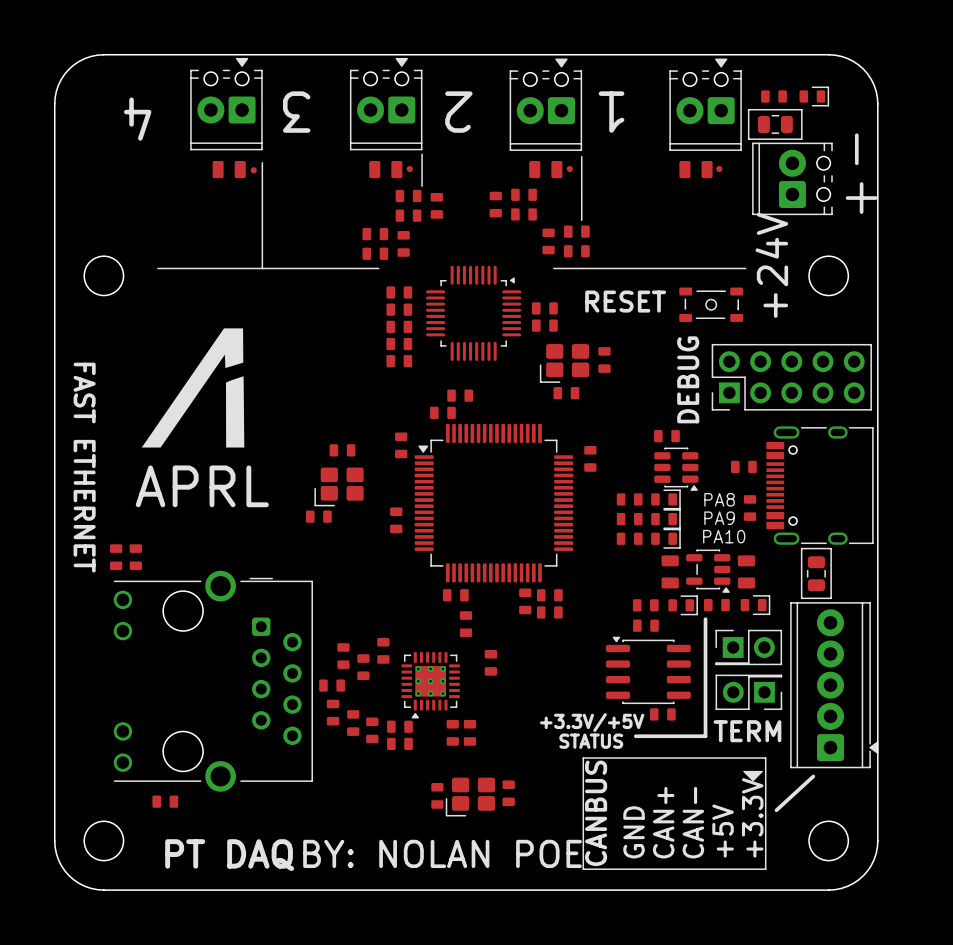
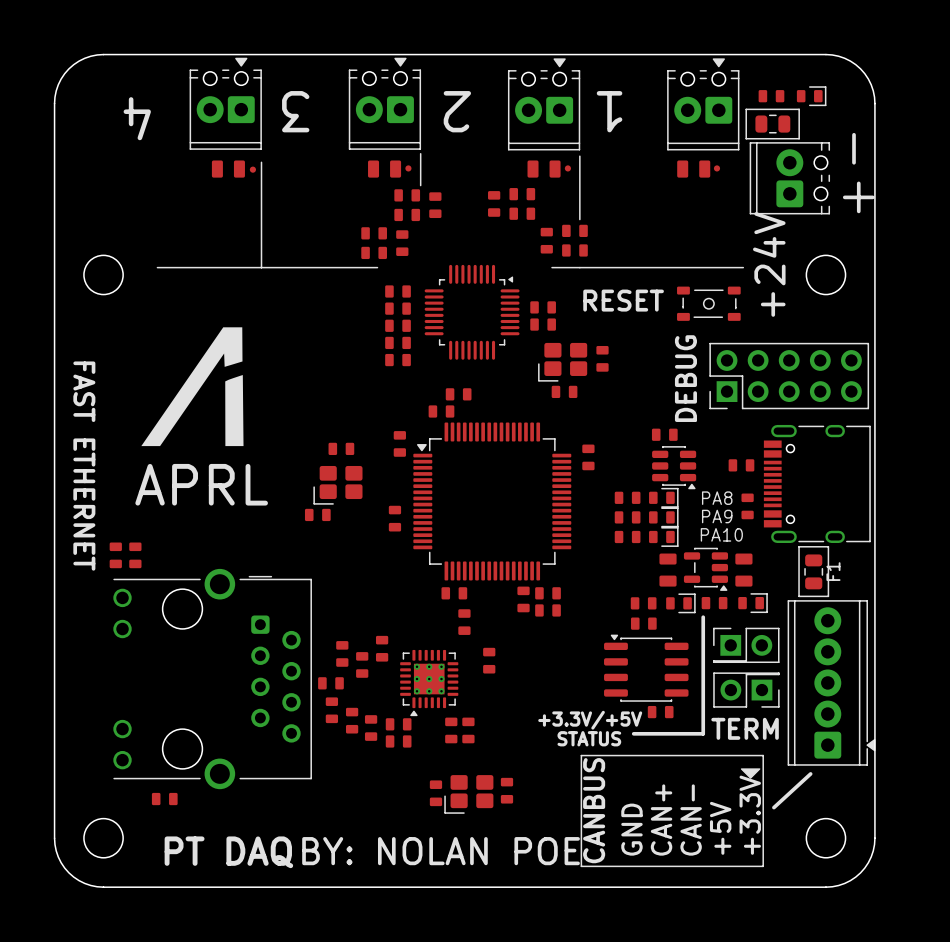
F1 name: none -> F1 (833, 571)

